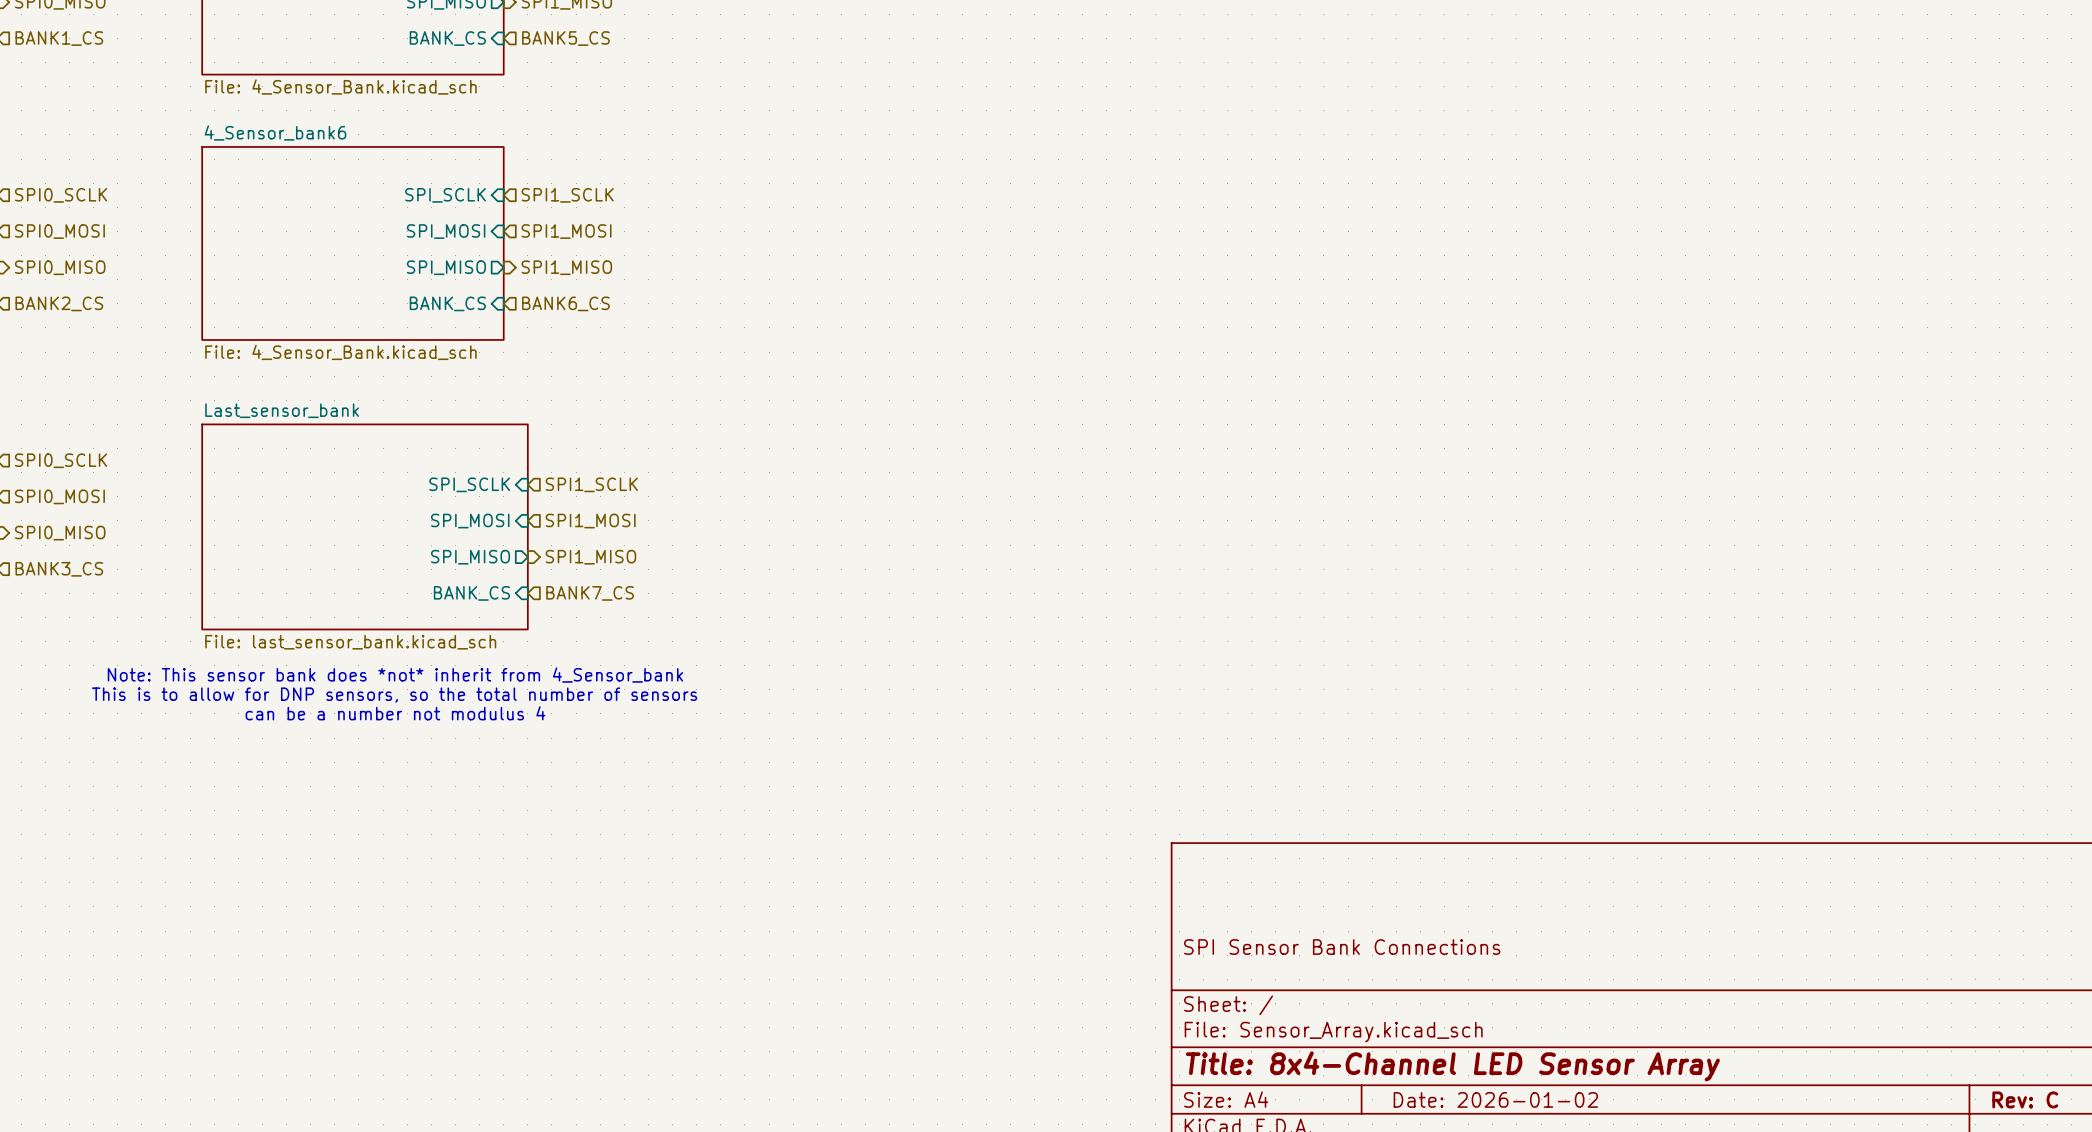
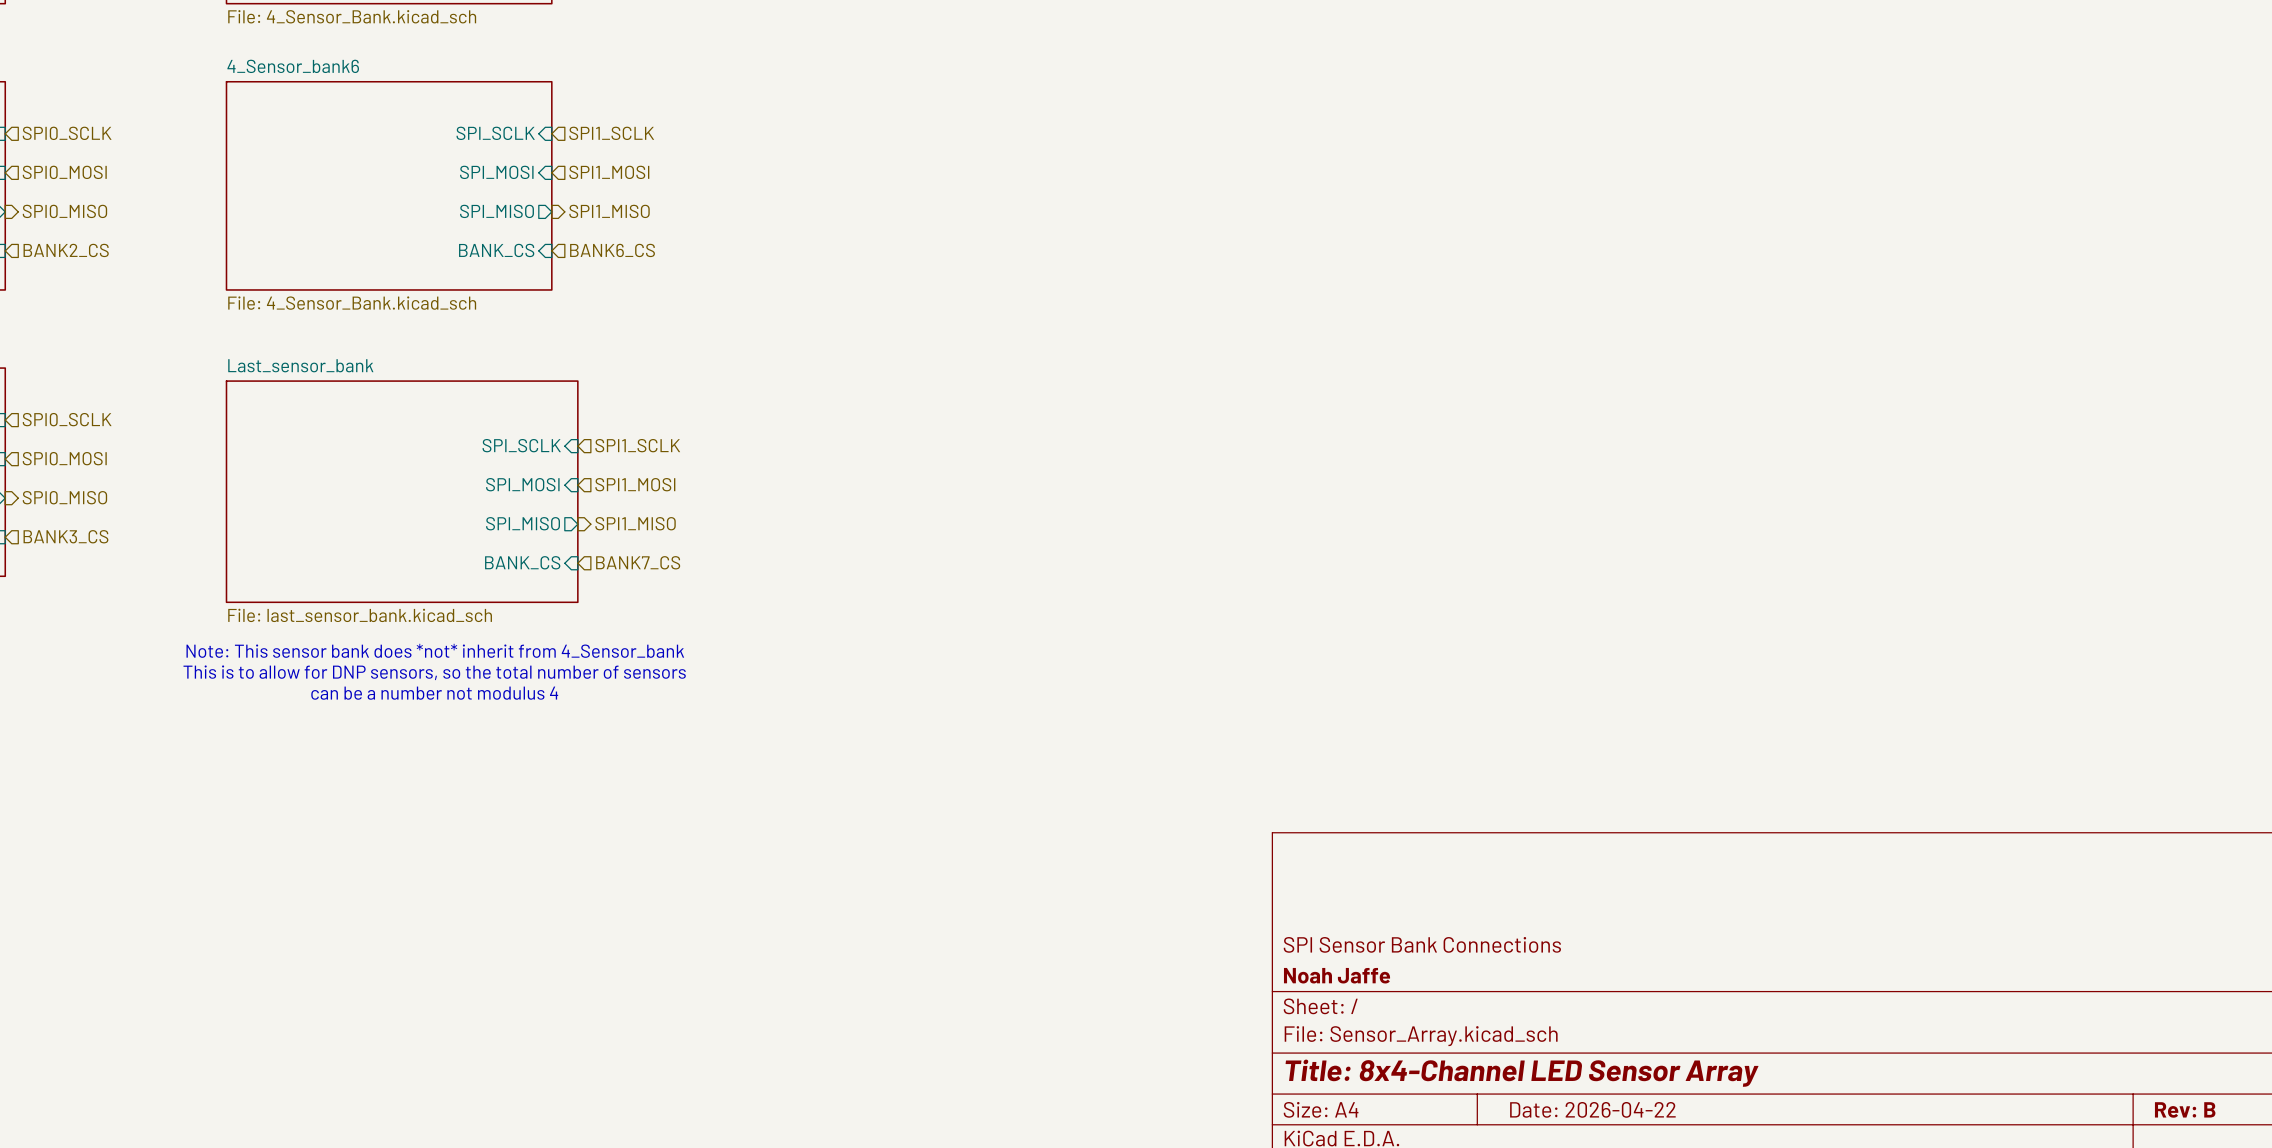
title block: none -> Noah Jaffe (1337, 975)
title block: Date: 2026-01-02 (1495, 1099) -> Date: 2026-04-22 (1592, 1109)
title block: Rev: C (2025, 1099) -> Rev: B (2185, 1109)

